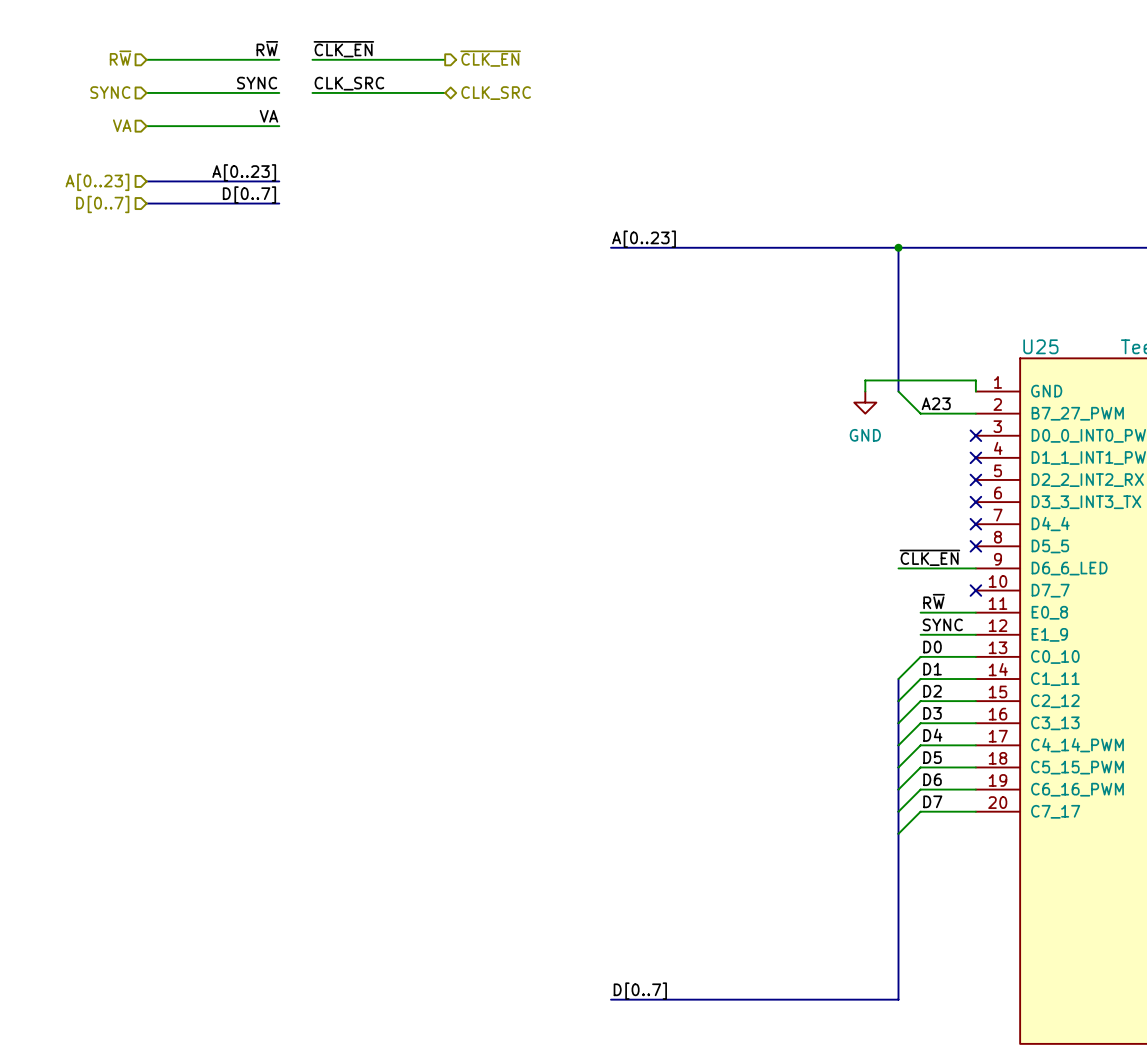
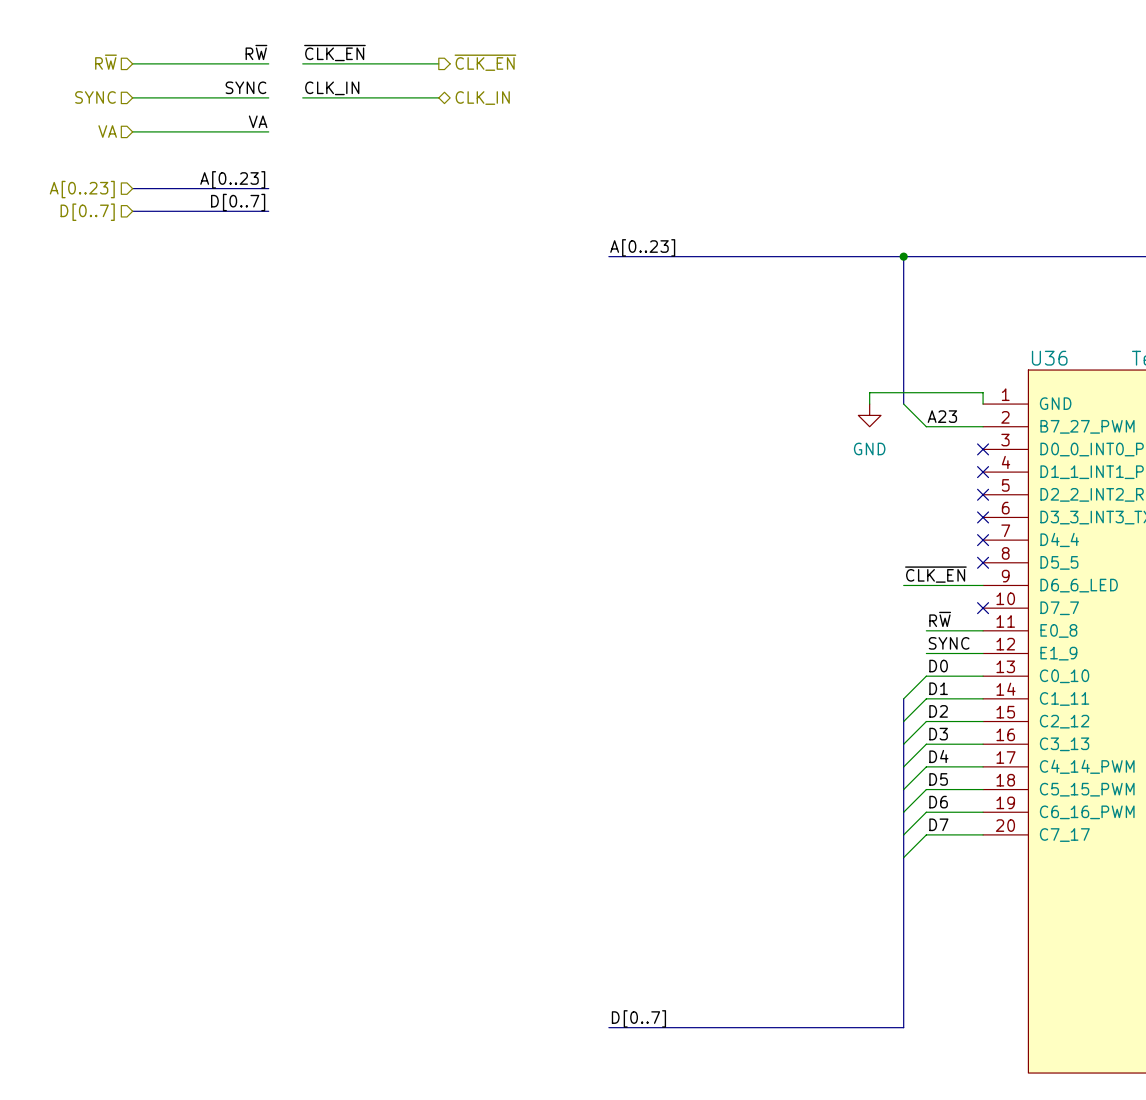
label: CLK_SRC (349, 83) -> CLK_IN (332, 88)
hierarchical label: CLK_SRC (496, 93) -> CLK_IN (482, 98)
U25 name: U25 (1040, 346) -> U36 (1049, 358)

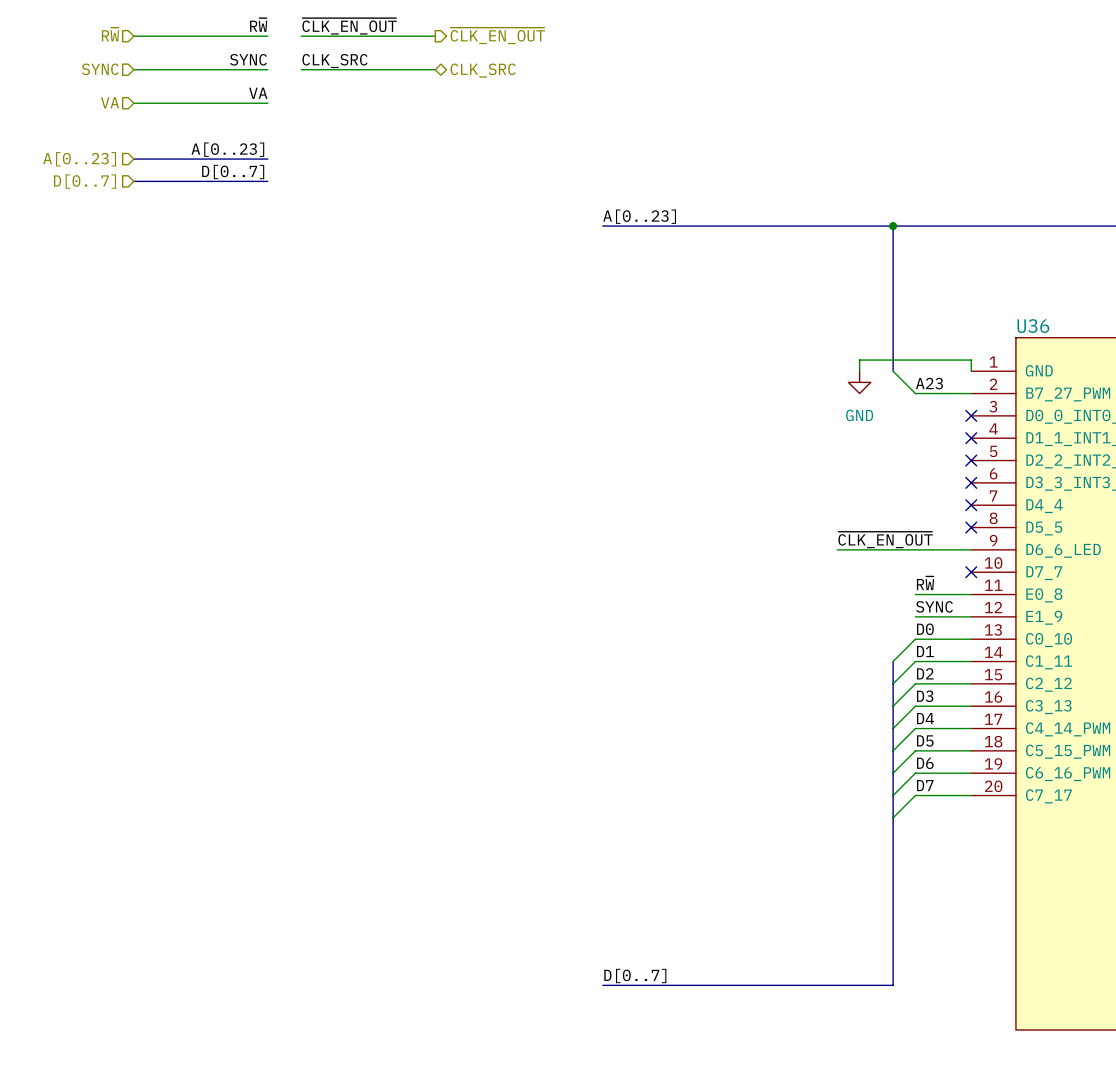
label: ~{CLK_EN} (334, 53) -> ~{CLK_EN_OUT} (349, 26)
hierarchical label: ~{CLK_EN} (485, 62) -> ~{CLK_EN_OUT} (497, 35)
label: CLK_IN (332, 88) -> CLK_SRC (334, 61)
hierarchical label: CLK_IN (482, 98) -> CLK_SRC (483, 70)
label: ~{CLK_EN} (935, 574) -> ~{CLK_EN_OUT} (885, 539)
wire: none -> (837, 549) (893, 549)

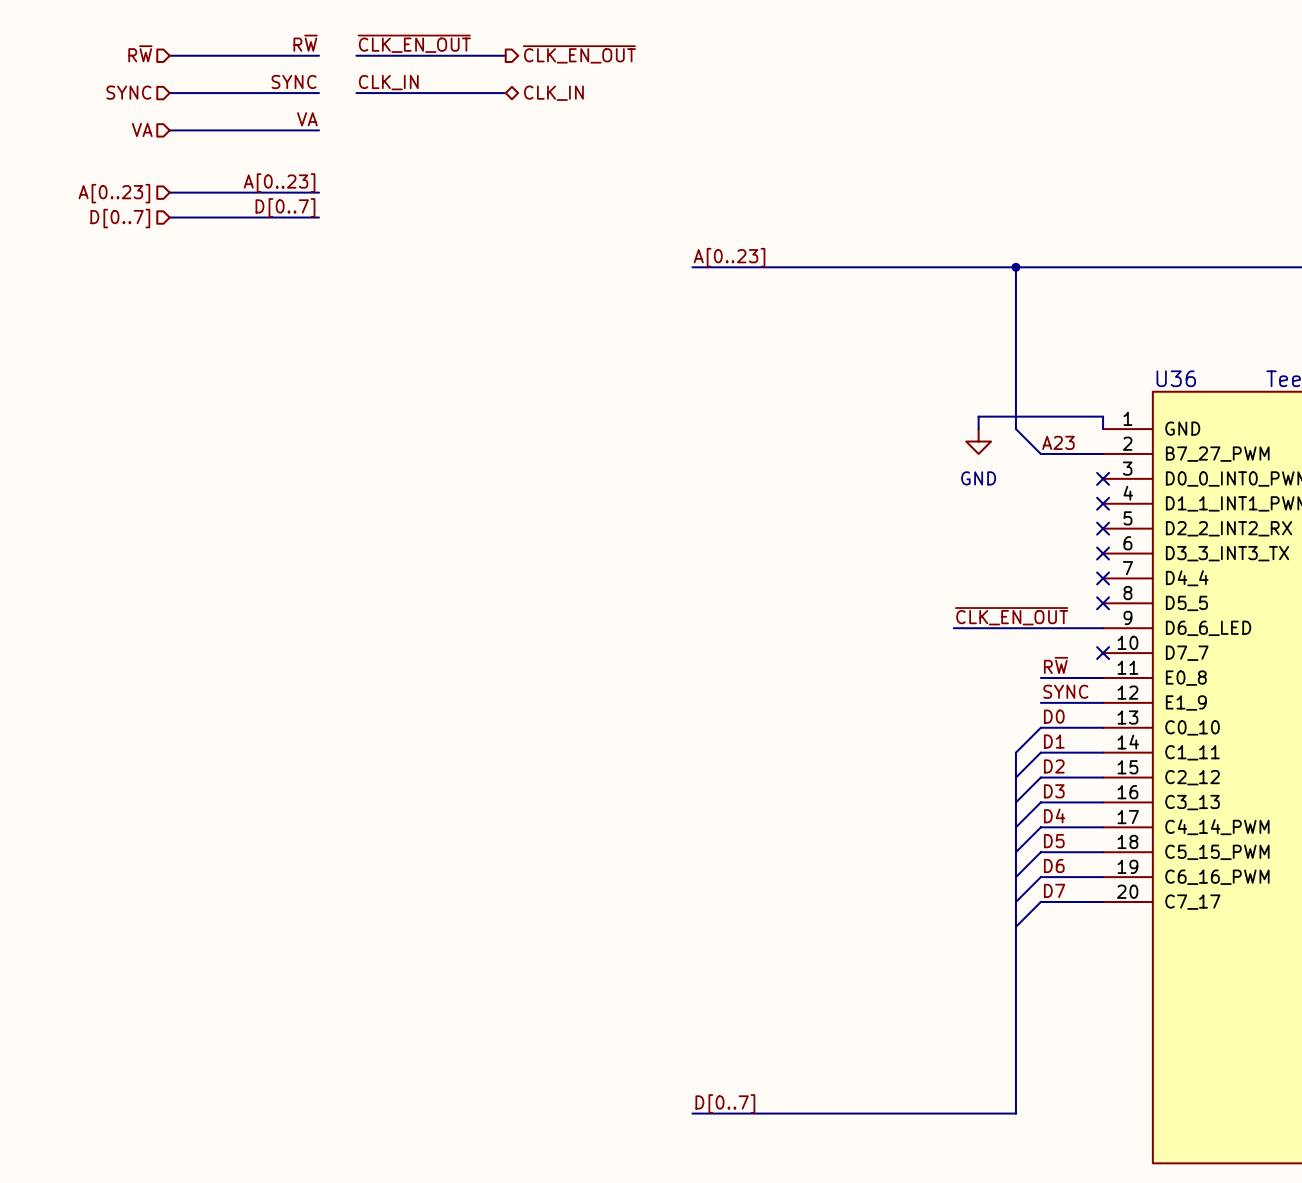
label: CLK_SRC (334, 61) -> CLK_IN (388, 82)
hierarchical label: CLK_SRC (483, 70) -> CLK_IN (553, 93)

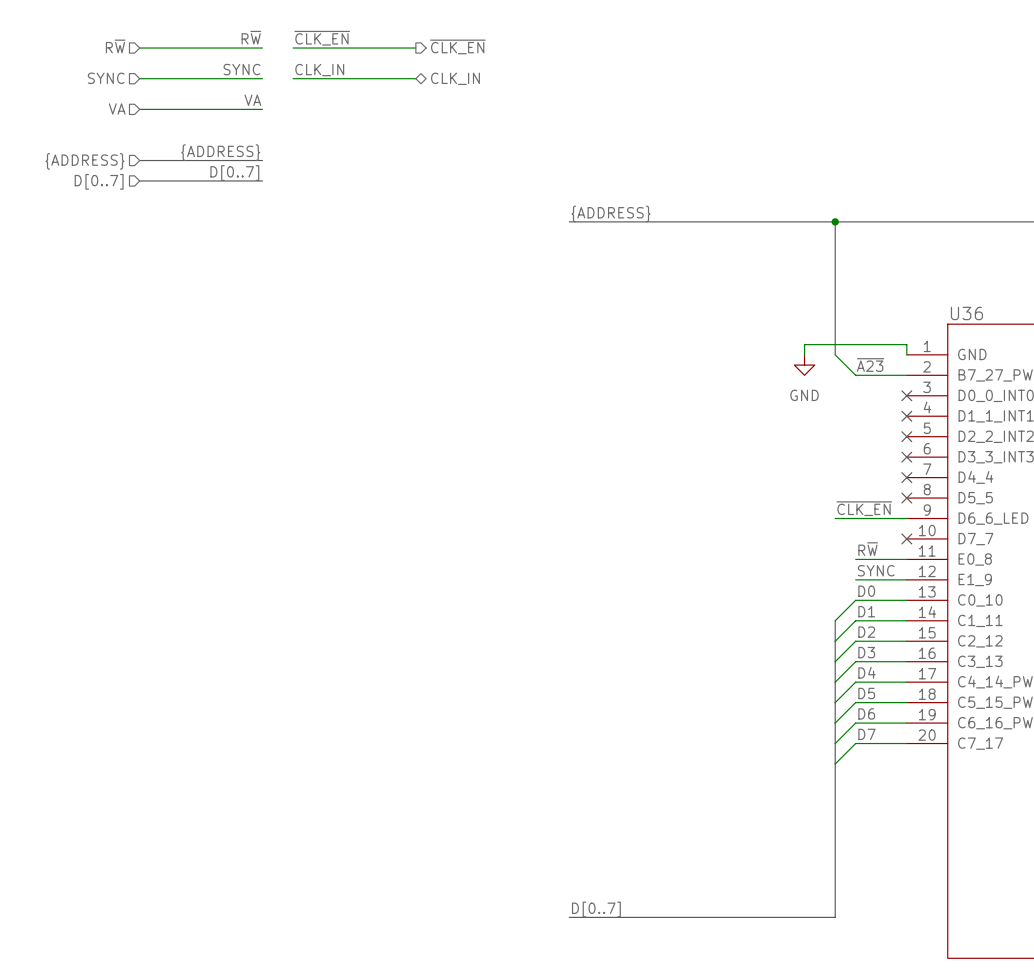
label: ~{CLK_EN_OUT} (414, 43) -> ~{CLK_EN} (322, 38)
hierarchical label: ~{CLK_EN_OUT} (579, 54) -> ~{CLK_EN} (457, 46)
label: A[0..23] (279, 183) -> {ADDRESS} (220, 152)
hierarchical label: A[0..23] (114, 193) -> {ADDRESS} (85, 161)
label: A[0..23] (729, 257) -> {ADDRESS} (611, 213)
label: A23 (1058, 442) -> ~{A23} (870, 365)
label: ~{CLK_EN_OUT} (1011, 616) -> ~{CLK_EN} (864, 508)
wire: (953, 628) (1015, 628) -> none

